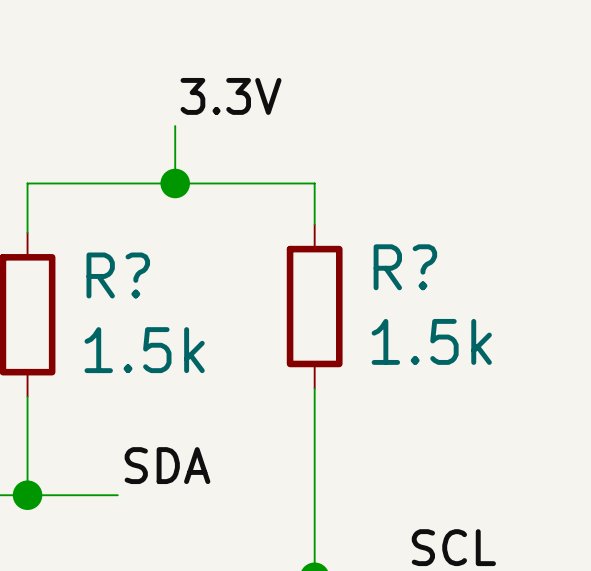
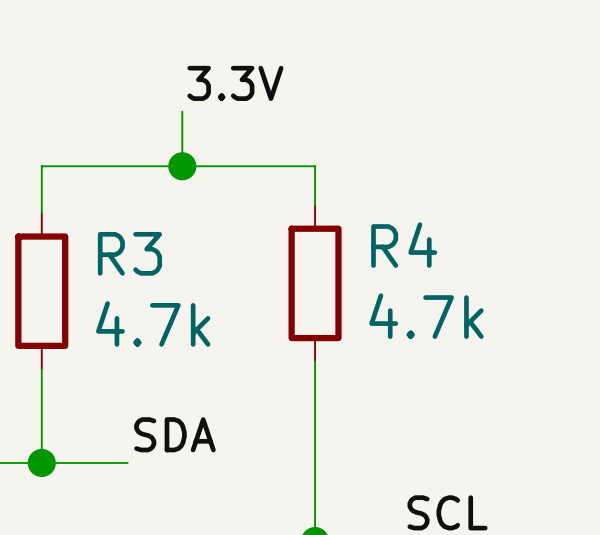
R? name: R? (405, 267) -> R4 (404, 245)
R? name: R? (118, 275) -> R3 (129, 253)
R? value: 1.5k (431, 341) -> 4.7k (426, 316)
R? value: 1.5k (144, 350) -> 4.7k (153, 323)

